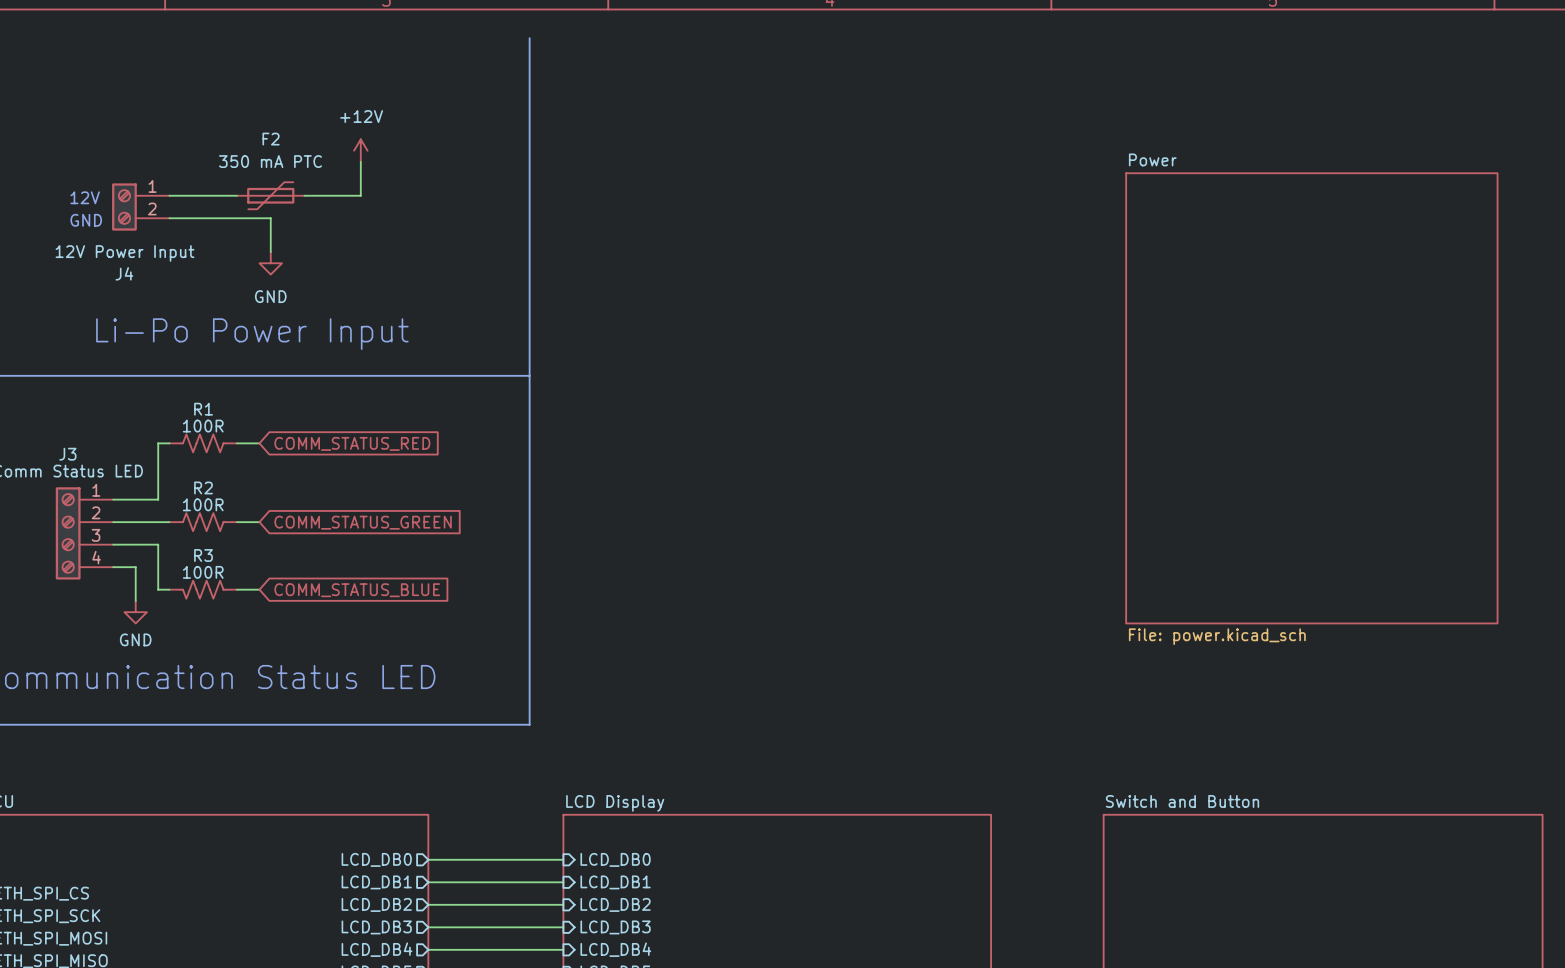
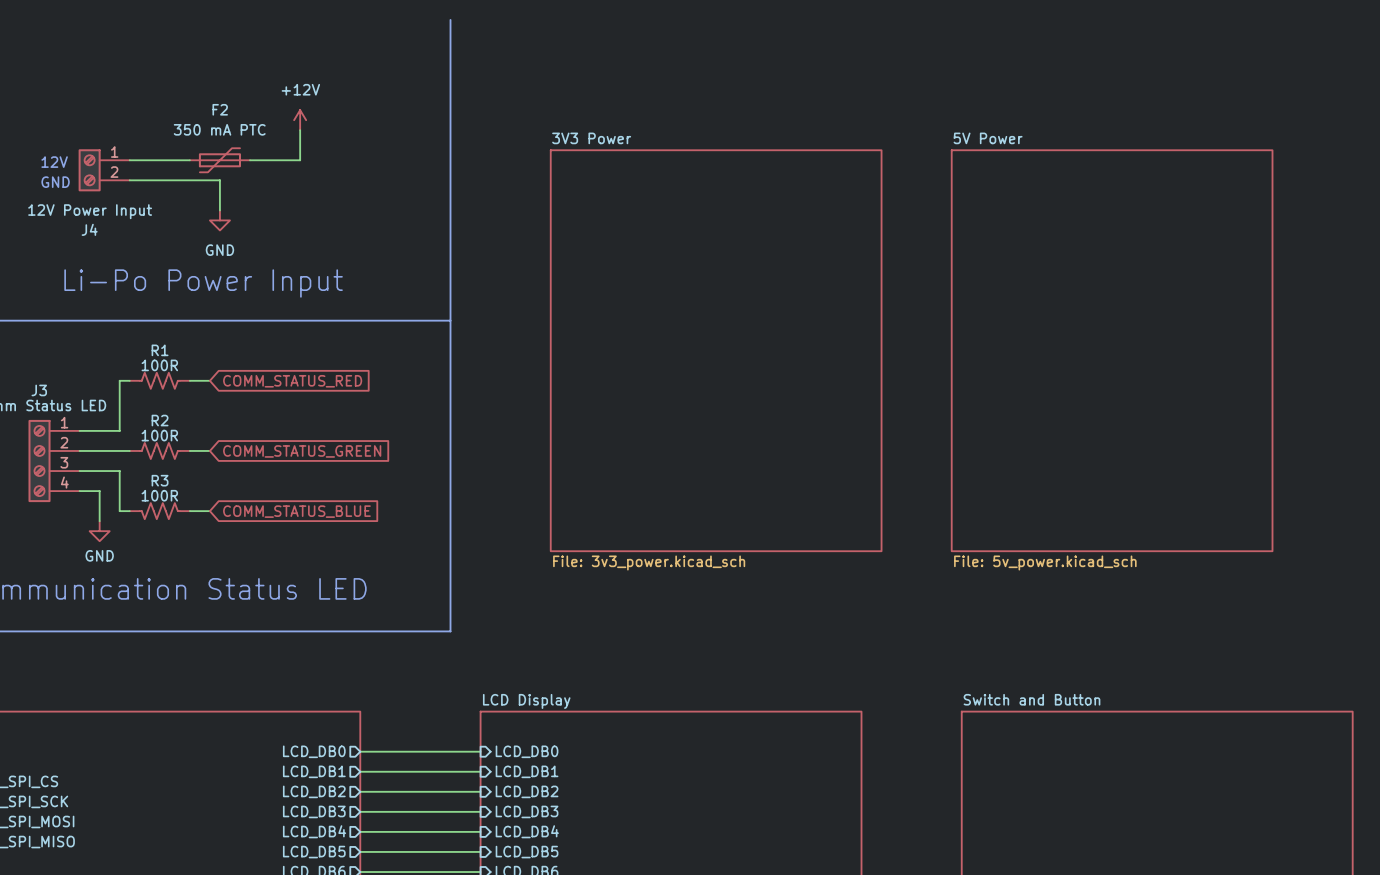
sheet Power: File: power.kicad_sch (1311, 398) -> none
sheet 3V3 Power: none -> File: 3v3_power.kicad_sch (716, 350)
sheet 5V Power: none -> File: 5v_power.kicad_sch (1112, 350)

